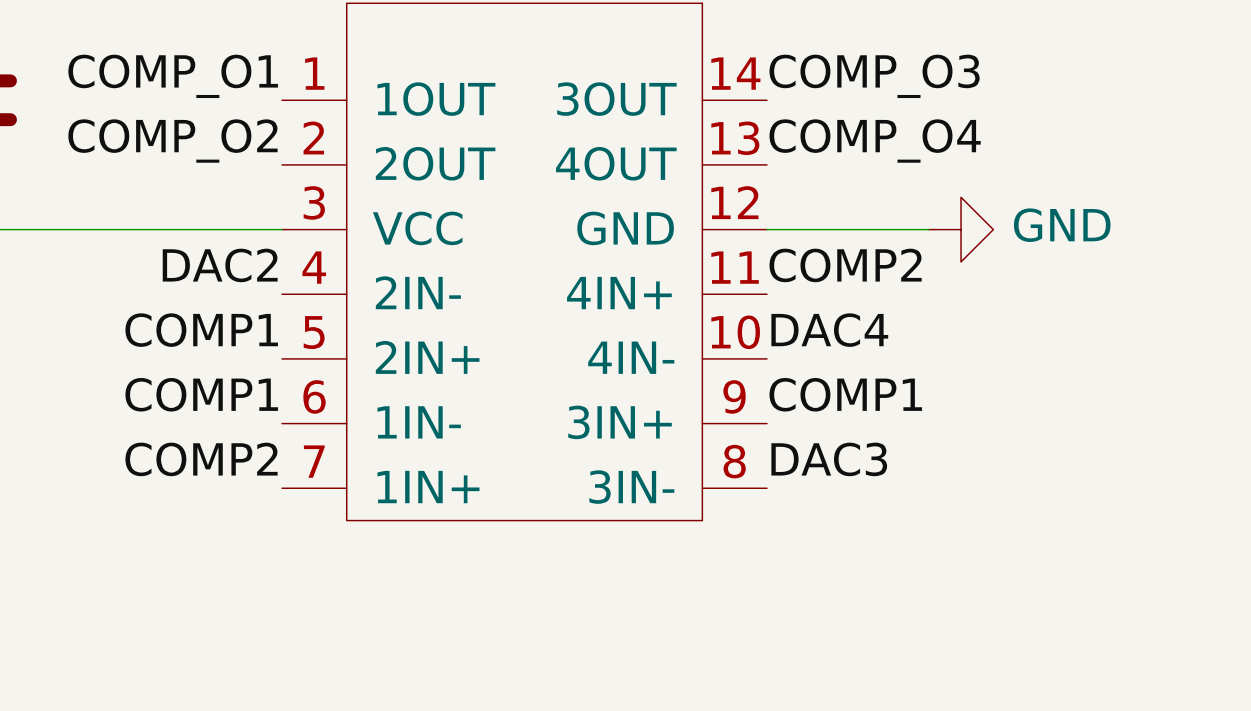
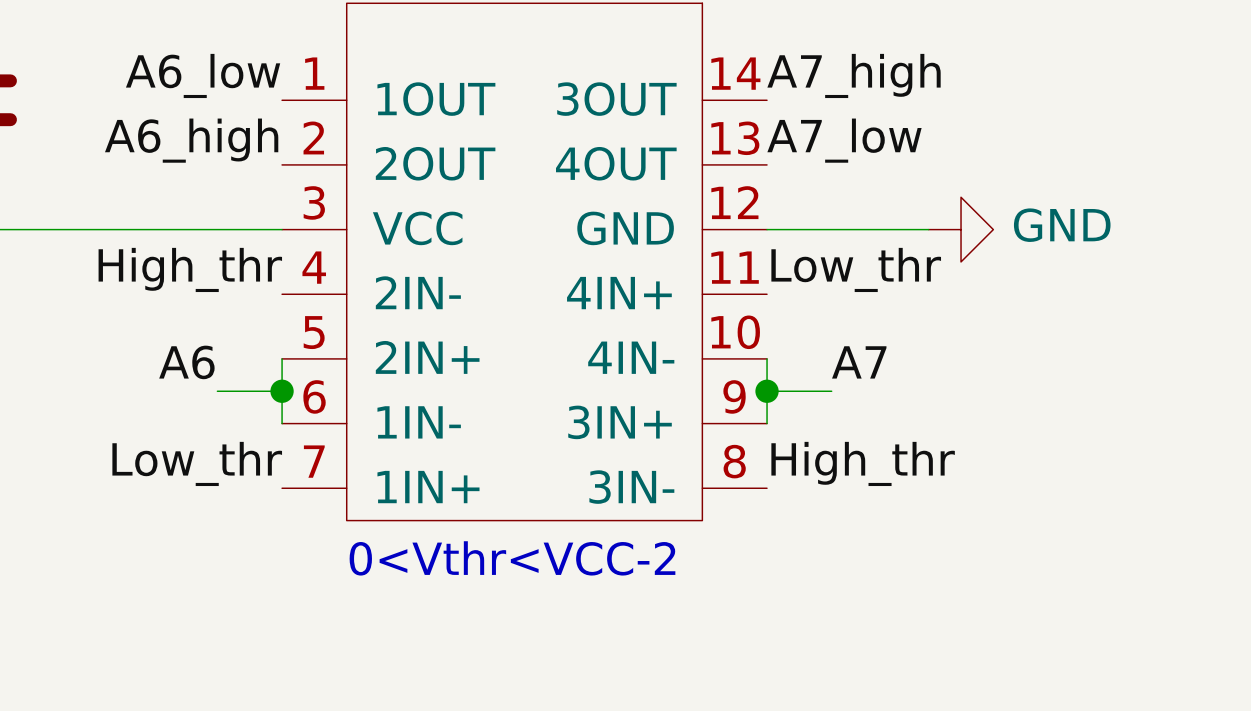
label: COMP_O1 (173, 76) -> A6_low (203, 75)
label: COMP_O3 (874, 76) -> A7_high (854, 75)
label: COMP_O2 (172, 141) -> A6_high (191, 140)
label: COMP_O4 (875, 141) -> A7_low (844, 140)
label: DAC2 (220, 265) -> High_thr (190, 269)
label: COMP2 (845, 265) -> Low_thr (856, 269)
label: COMP1 (201, 330) -> none
label: DAC4 (829, 330) -> none
wire: none -> (282, 358) (282, 423)
wire: none -> (767, 358) (767, 423)
label: none -> A6 (186, 362)
label: none -> A7 (859, 362)
wire: none -> (217, 391) (282, 391)
junction: none -> (282, 391)
wire: none -> (767, 391) (831, 391)
junction: none -> (767, 391)
label: COMP1 (201, 394) -> none
label: COMP1 (845, 394) -> none
label: COMP2 (201, 459) -> Low_thr (197, 463)
label: DAC3 (829, 459) -> High_thr (863, 463)
text: none -> 0<Vthr<VCC-2 (512, 558)

